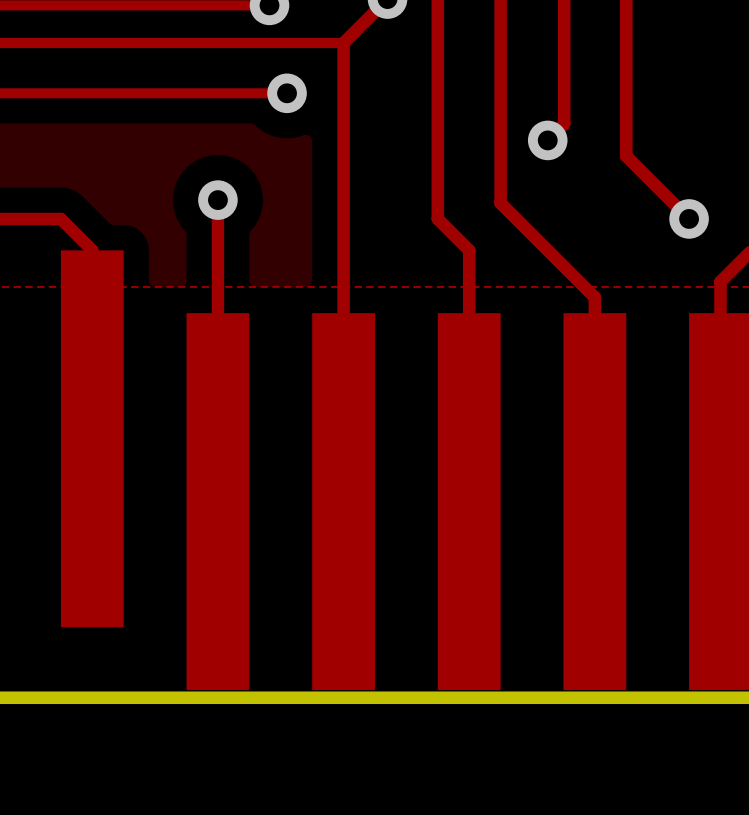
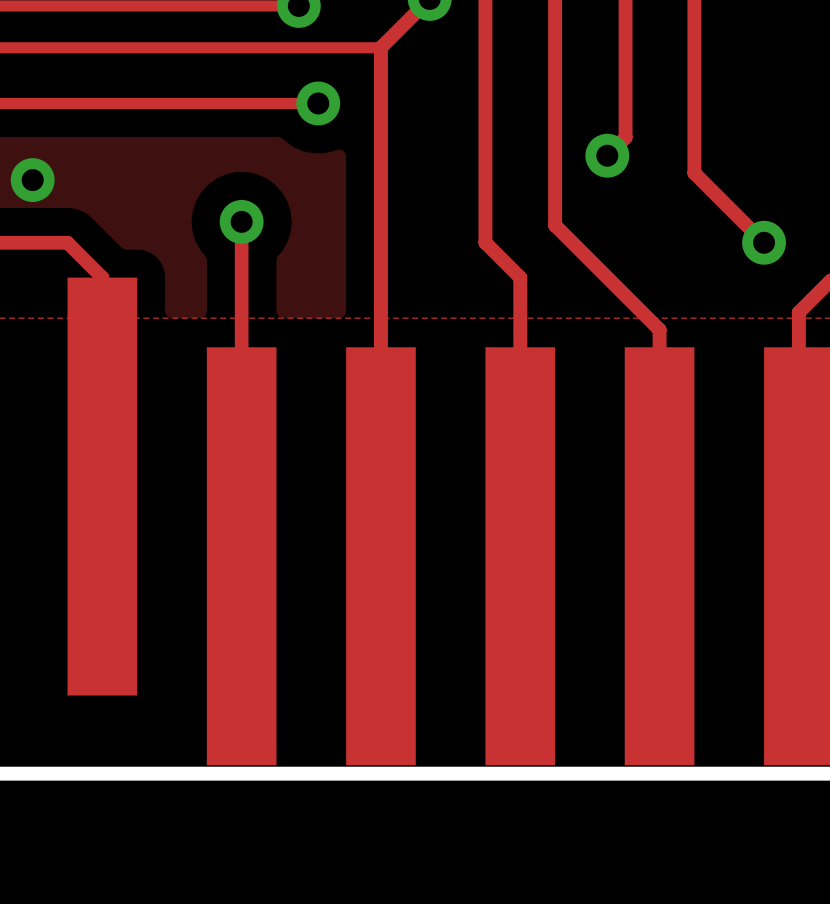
via: none -> (32, 180)

